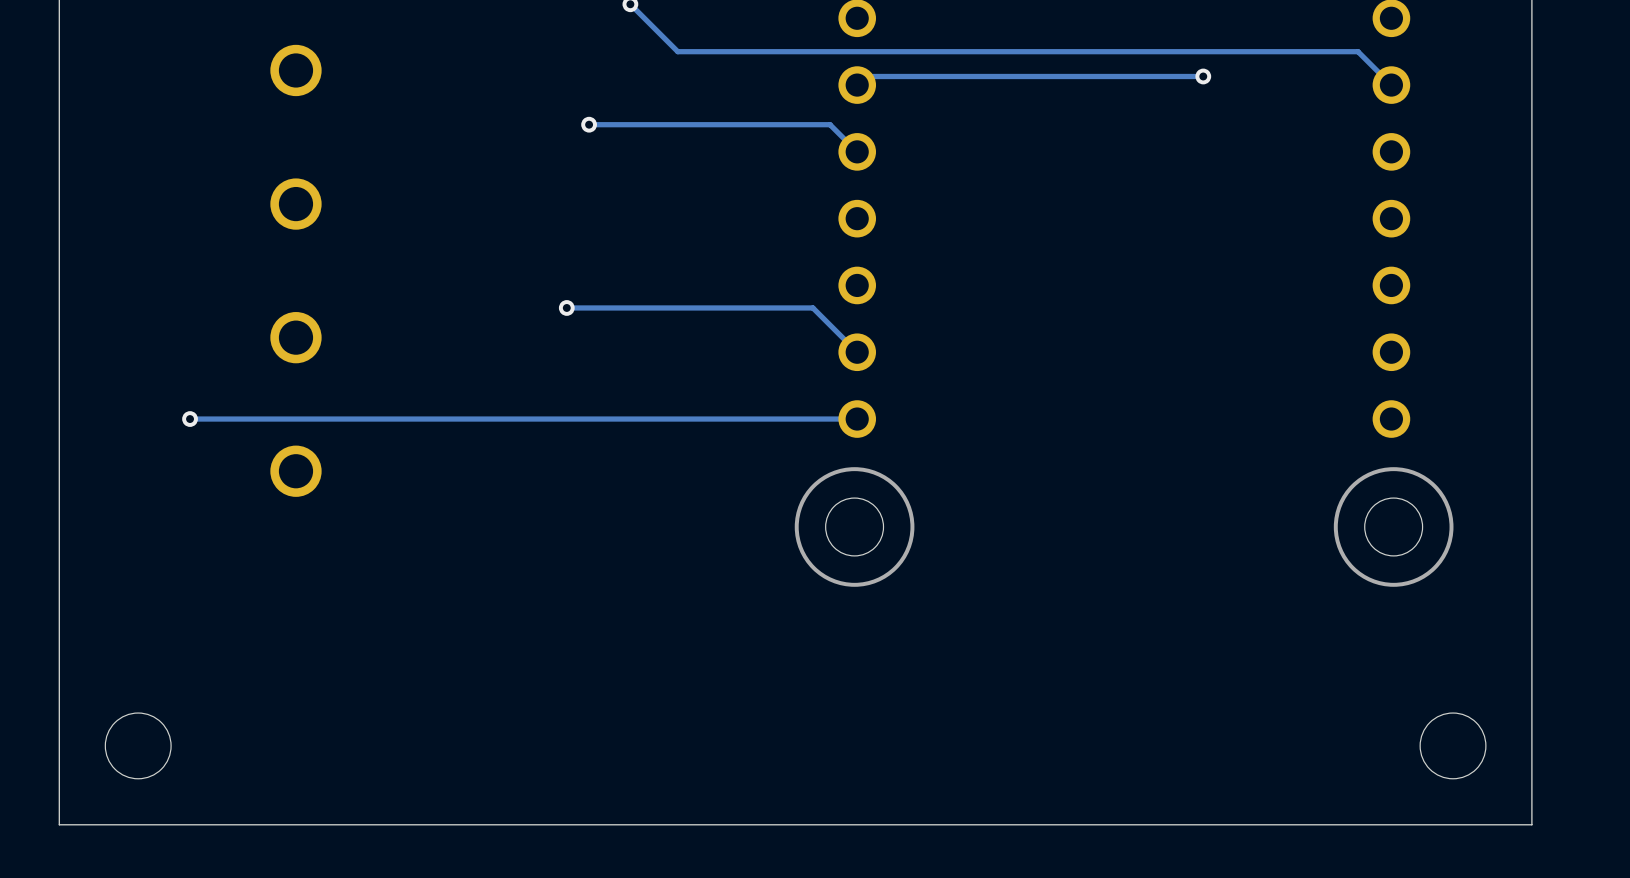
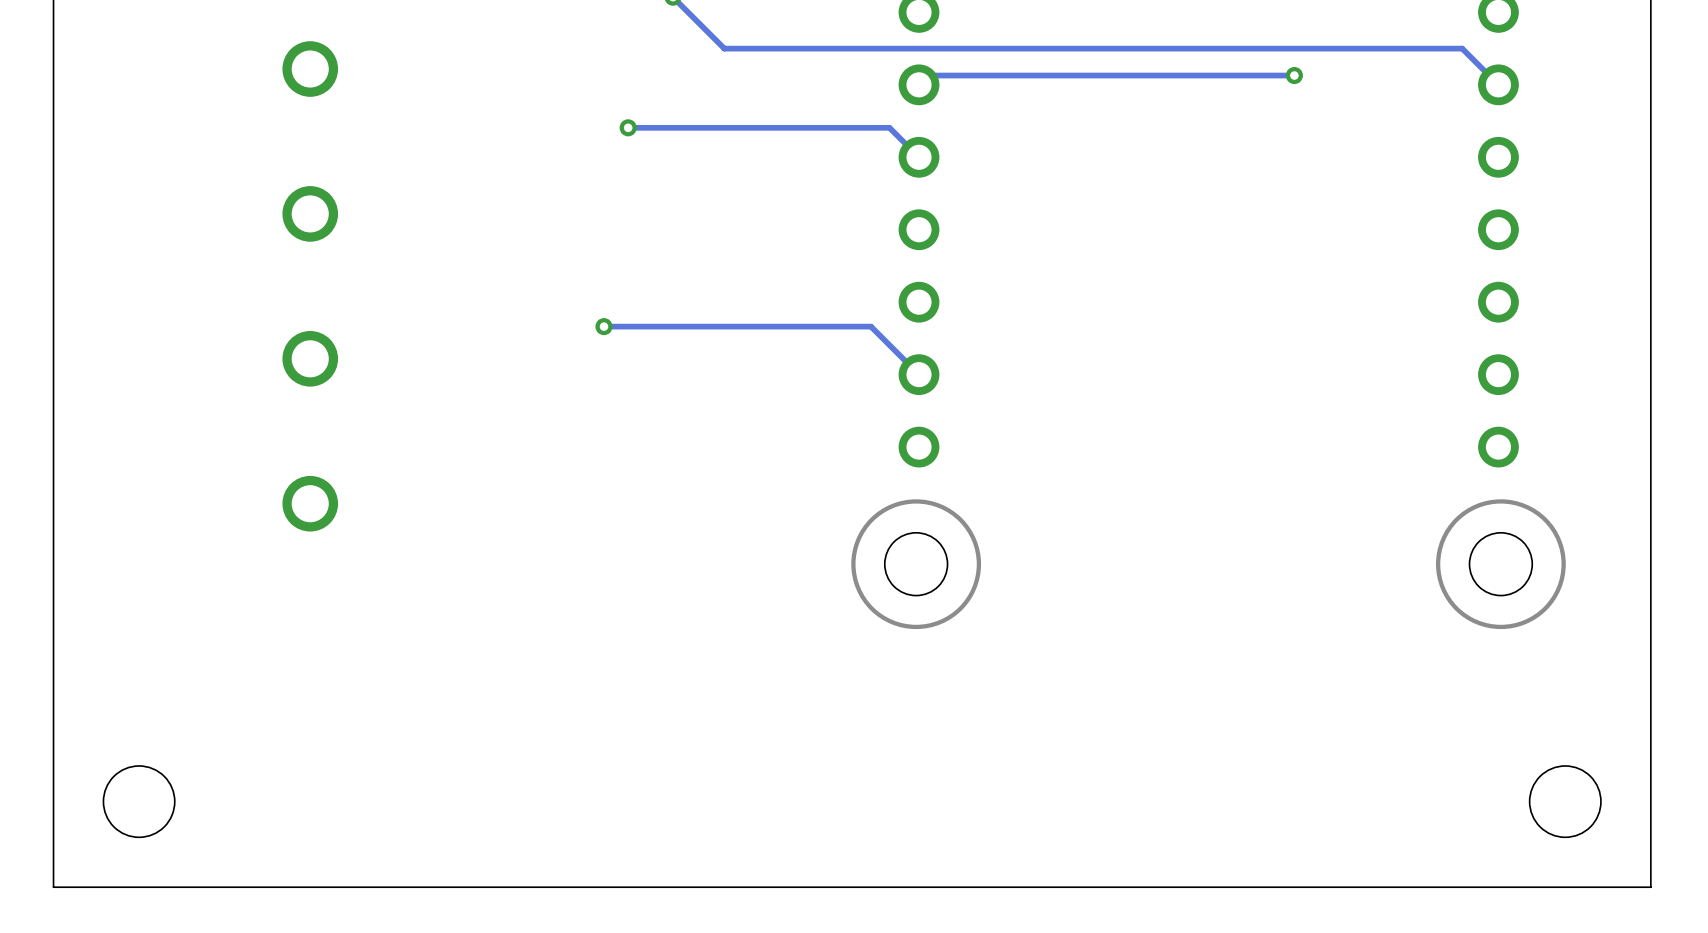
via: (190, 419) -> none
track: (857, 419) (190, 419) -> none

